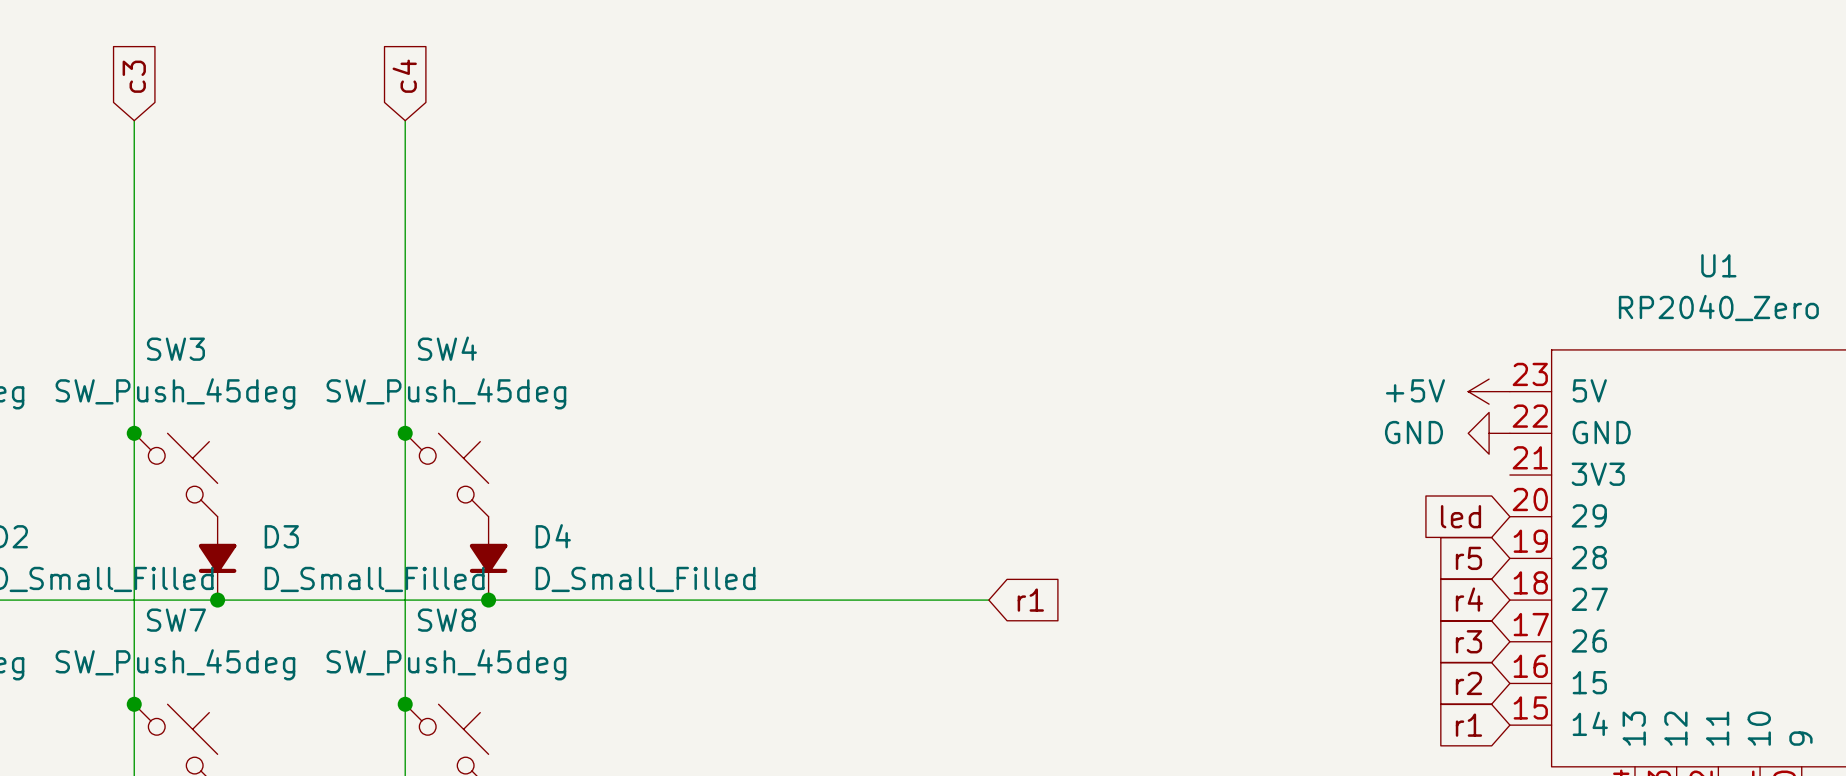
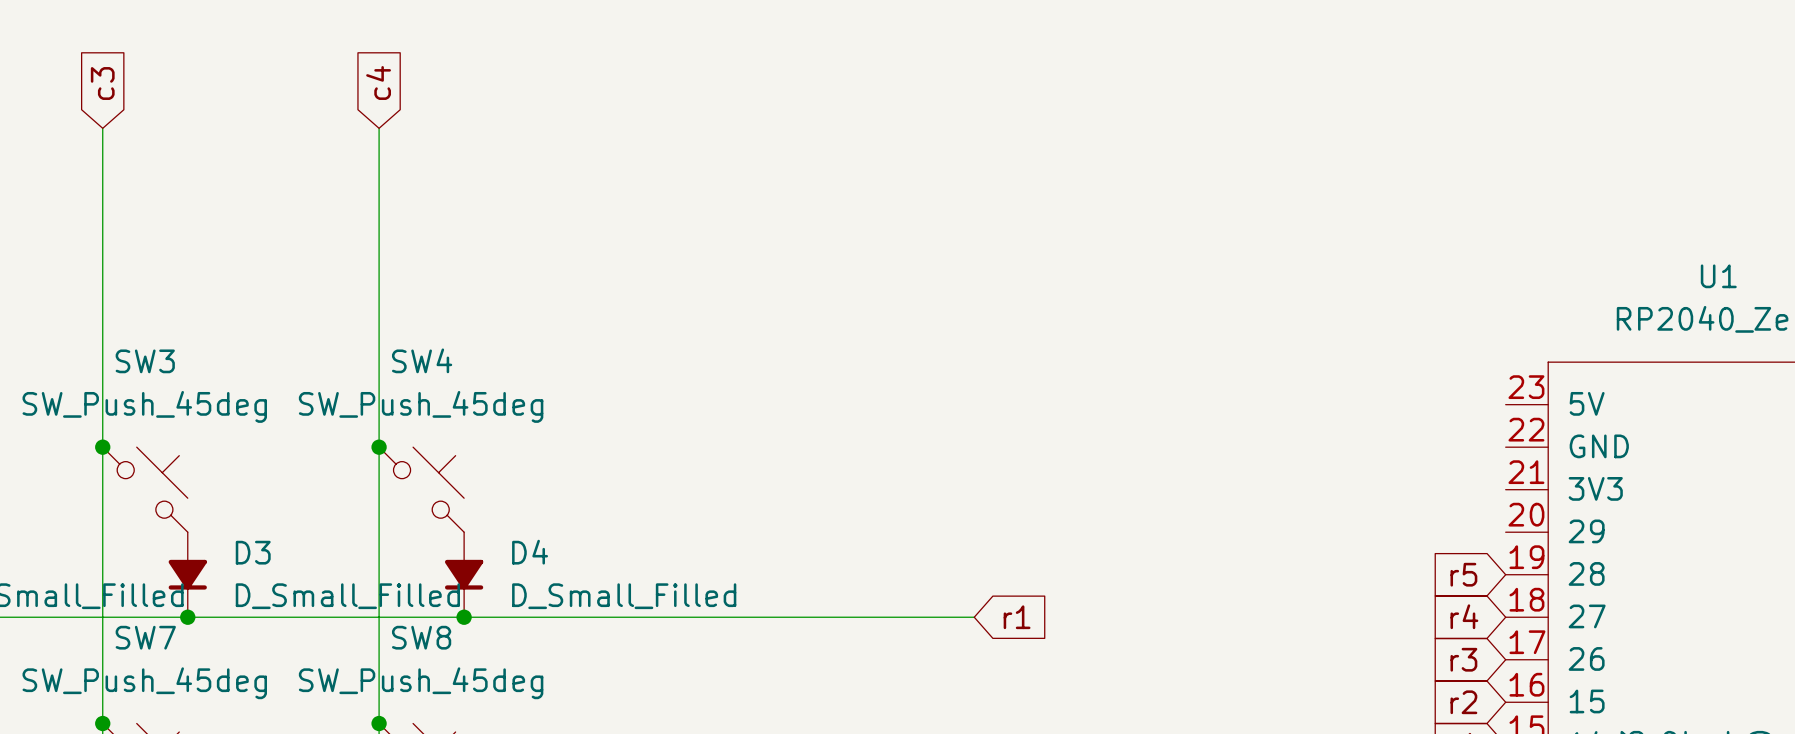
power symbol: +5V (1489, 391) -> none
power symbol: GND (1489, 433) -> none
global label: led (1461, 516) -> none

